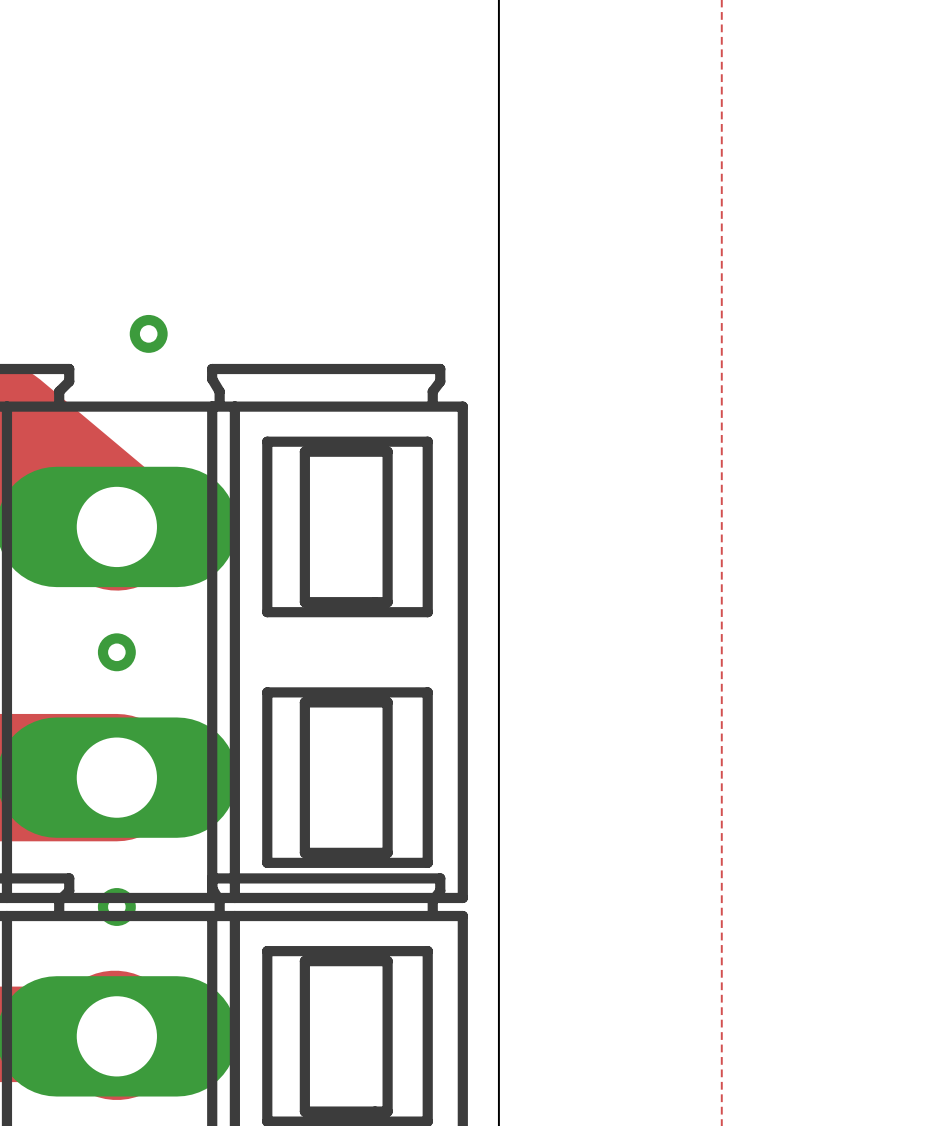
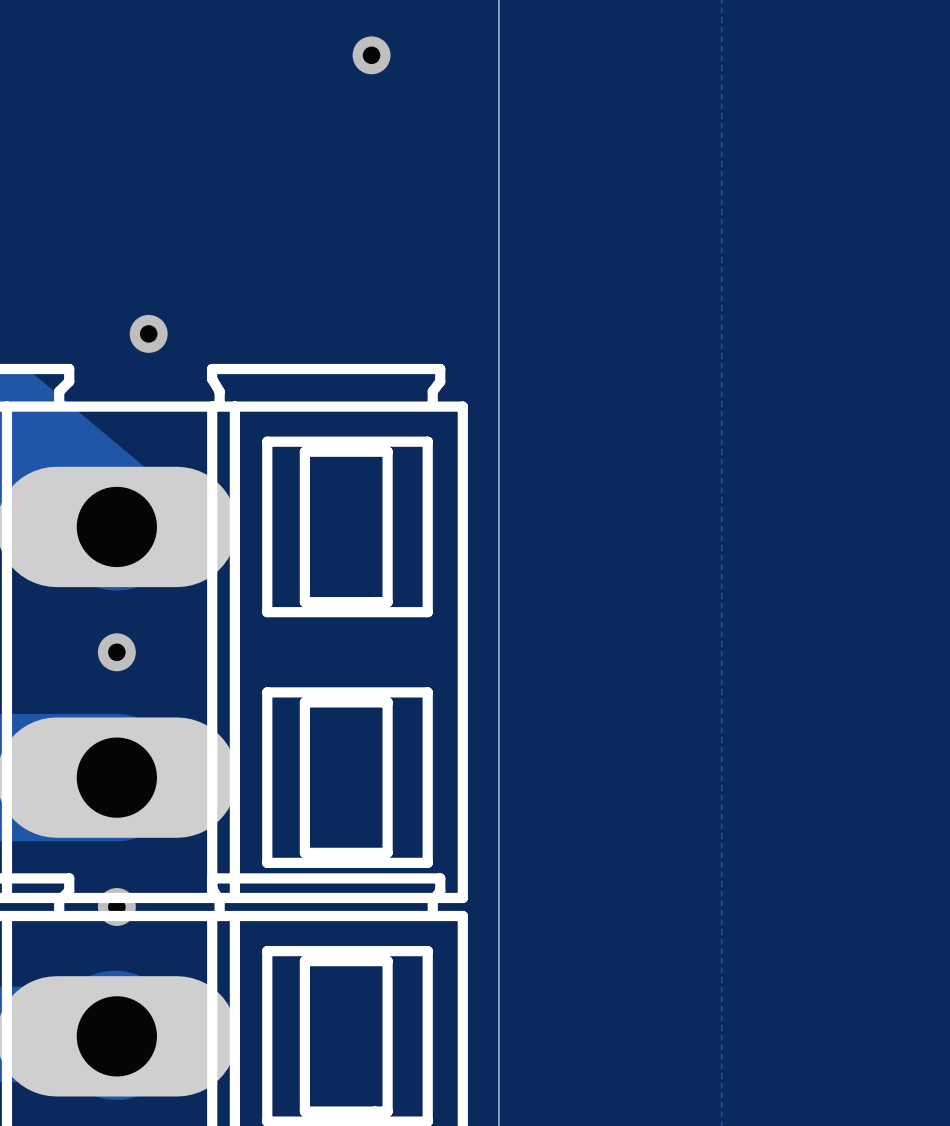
via: none -> (371, 55)

